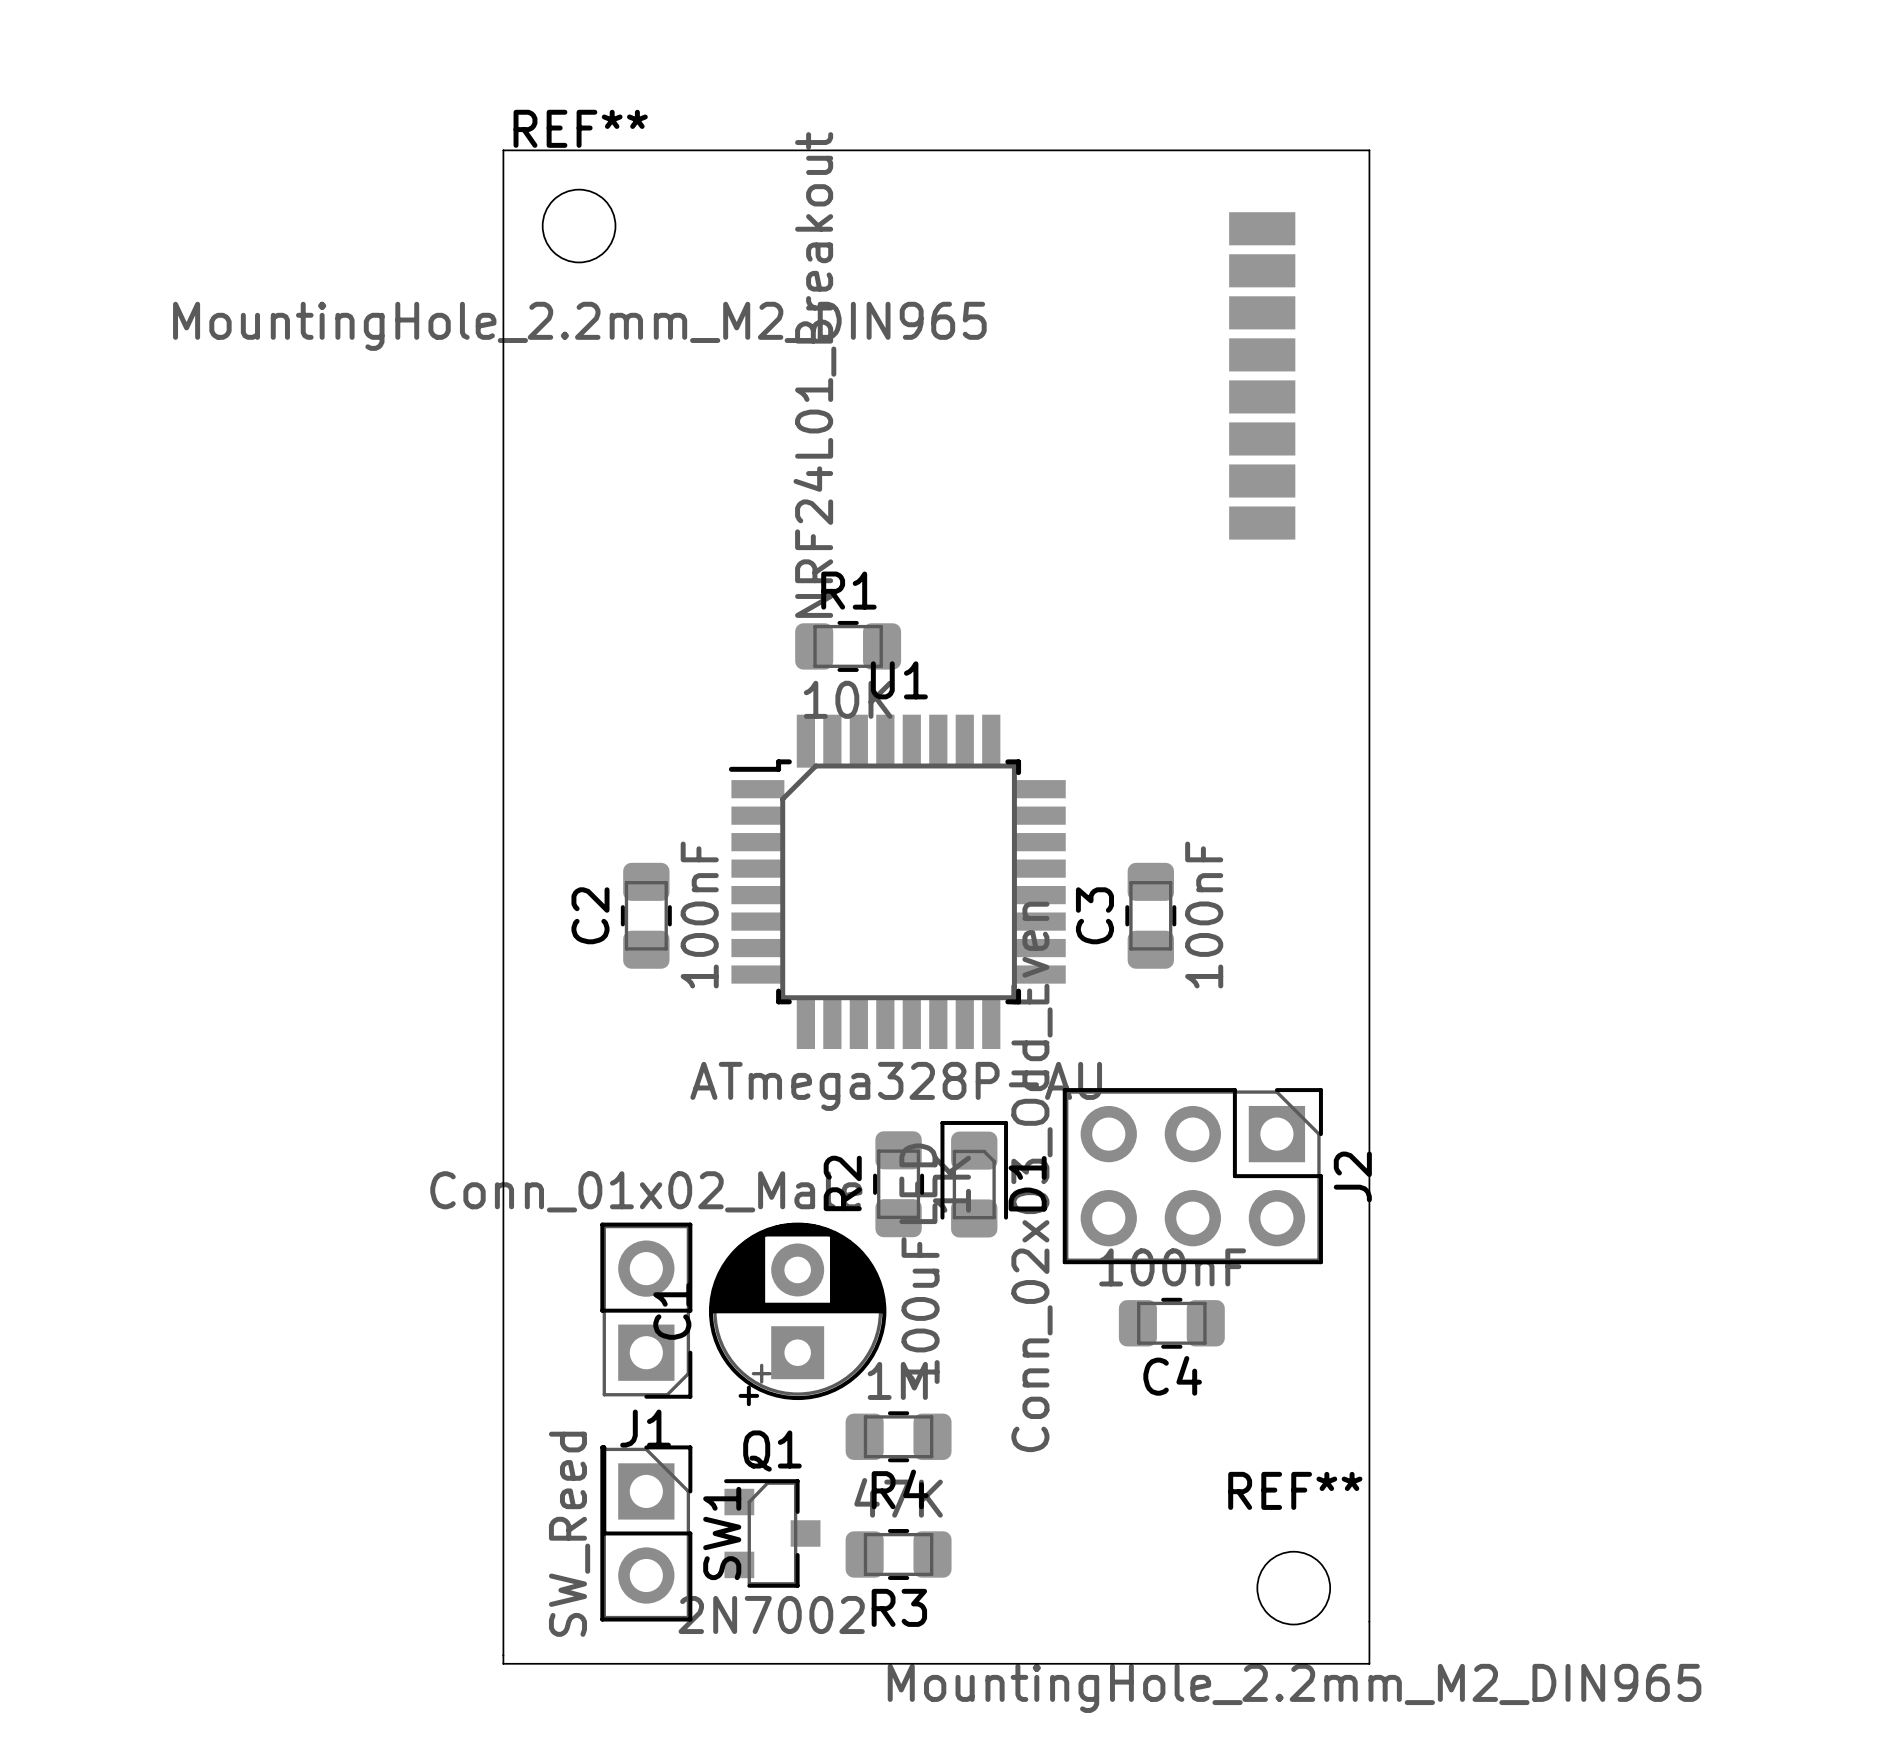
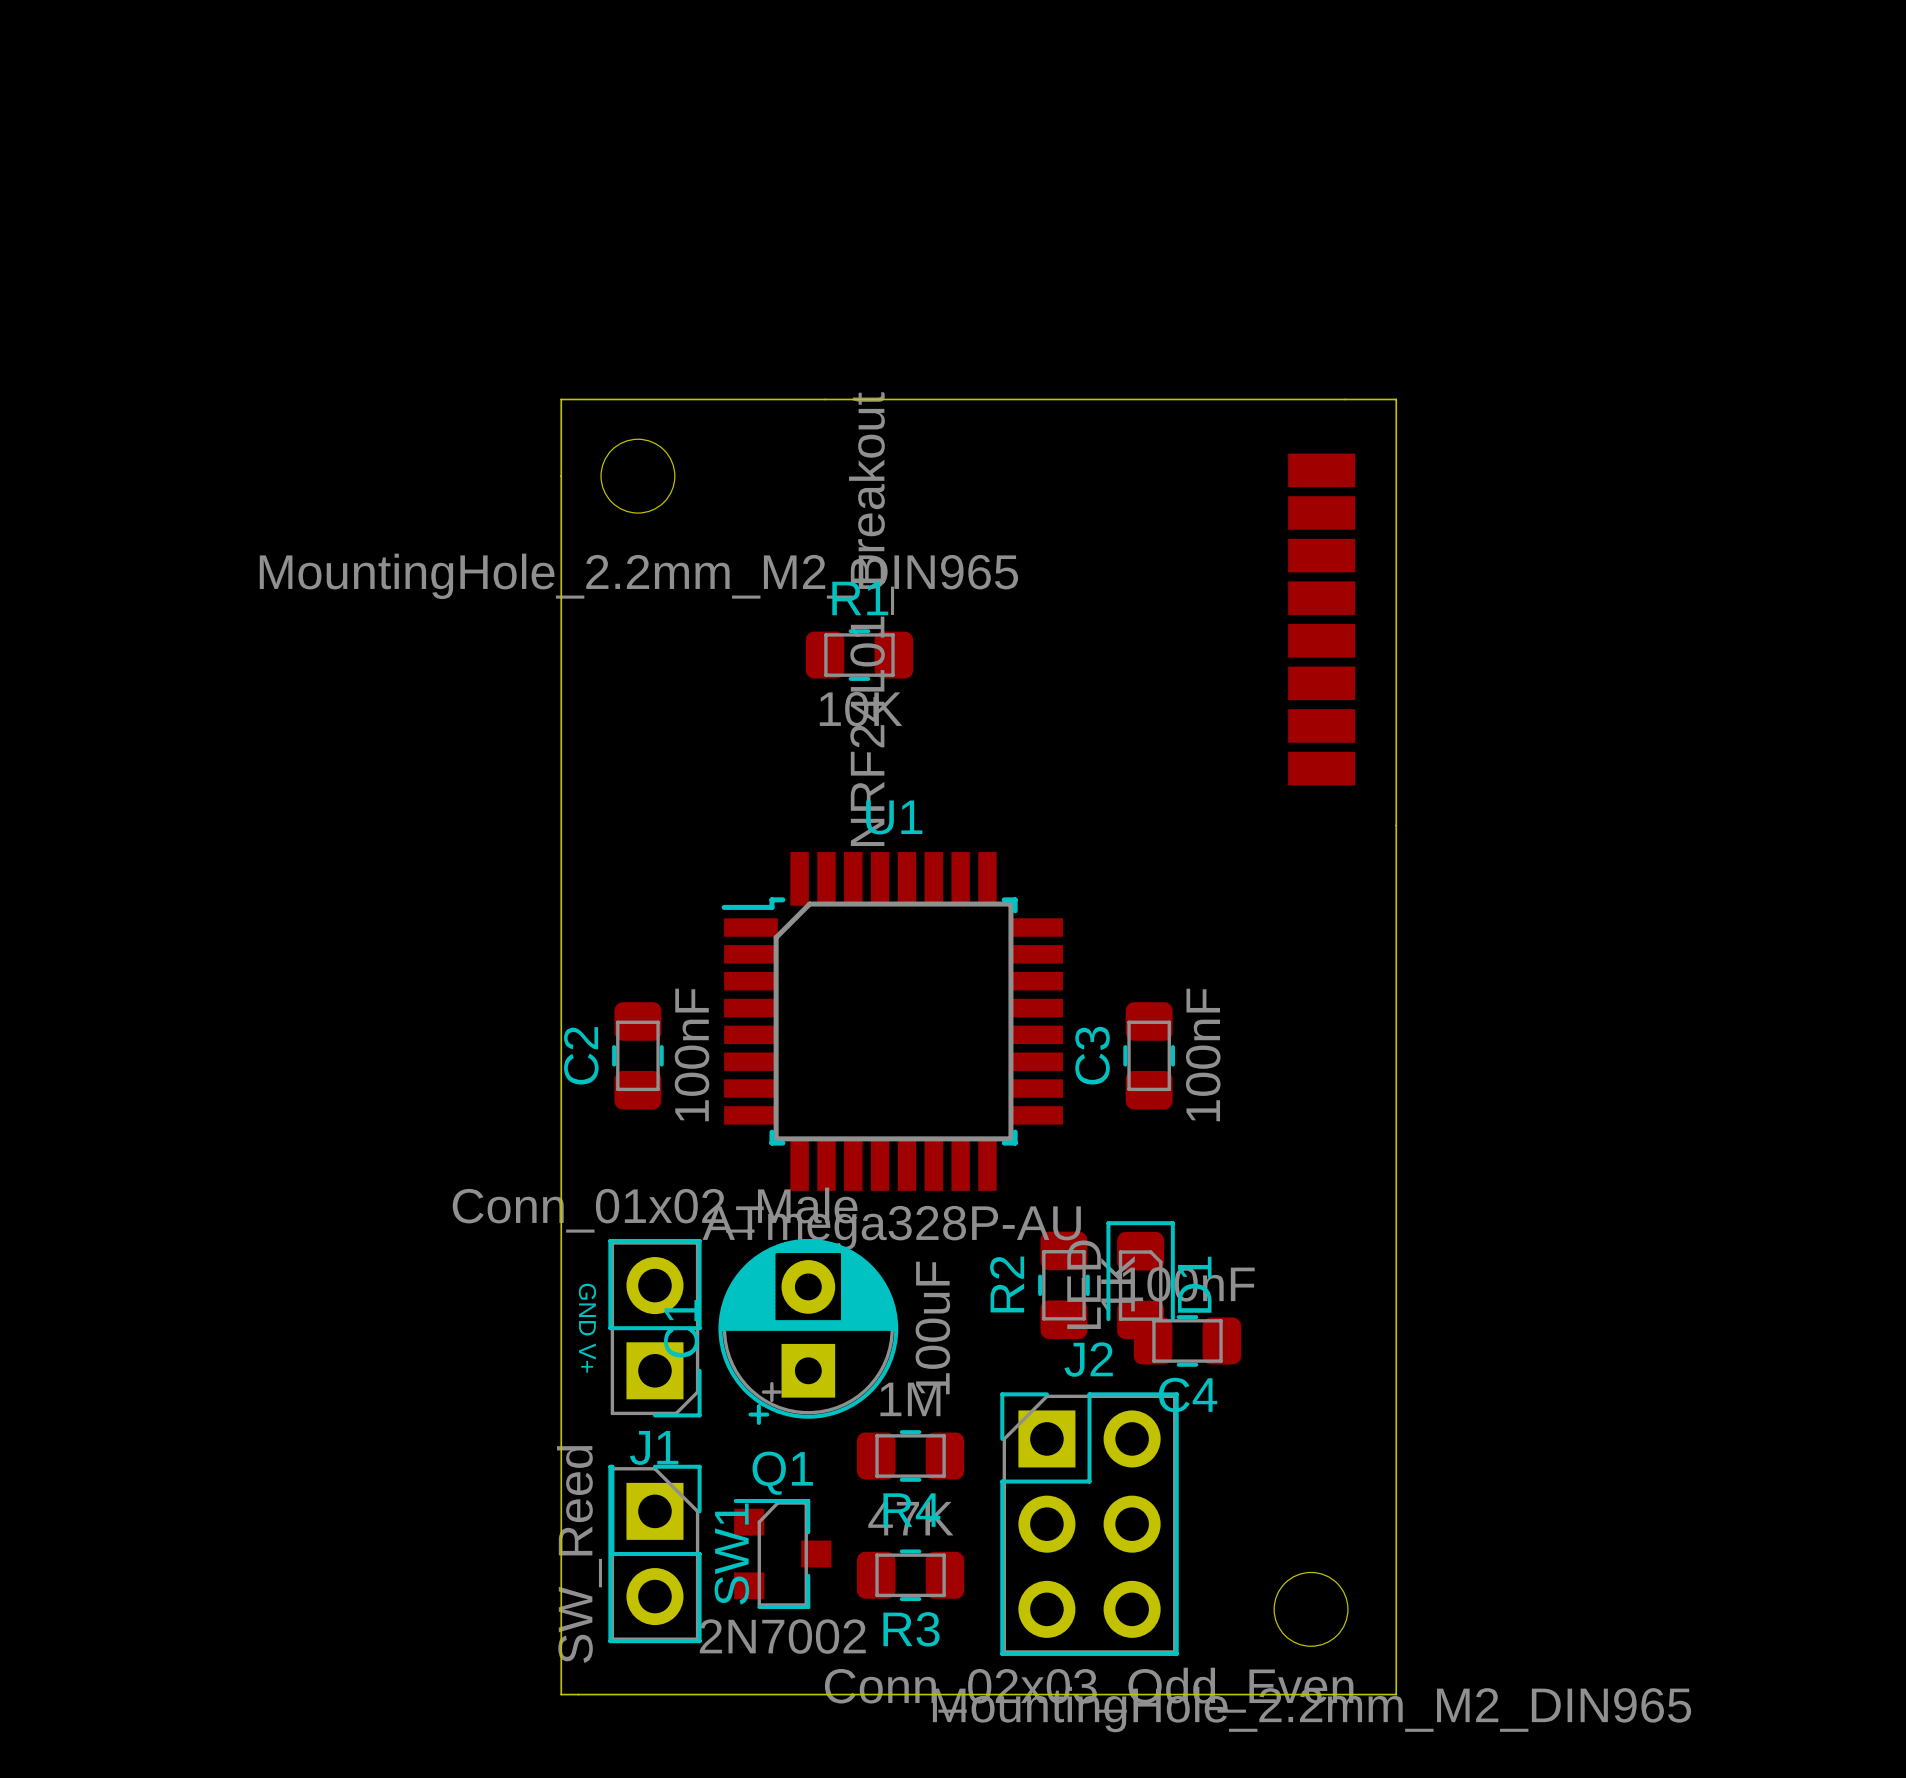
board edge: (503, 150) (503, 1663) (1369, 1663) (1369, 150) (503, 150) -> (561, 399) (561, 1694) (1396, 1694) (1396, 399) (561, 399)
REF**: MountingHole_2.2mm_M2_DIN965 (579, 226) -> none
part position: (1262, 375) -> (1321, 619)
part: none -> MountingHole_2.2mm_M2_DIN965 (637, 476)
U1 position: (897, 881) -> (892, 1021)
C2 position: (646, 915) -> (637, 1055)
C3 position: (1150, 915) -> (1149, 1055)
J2 rotation: 0° (1192, 1176) -> 90° counterclockwise (1089, 1524)
J2 position: (1192, 1176) -> (1089, 1524)
D1 position: (974, 1179) -> (1140, 1280)
R2 position: (898, 1184) -> (1063, 1285)
text: none -> GND V+ (587, 1328)
REF** name: REF** (1295, 1490) -> none

